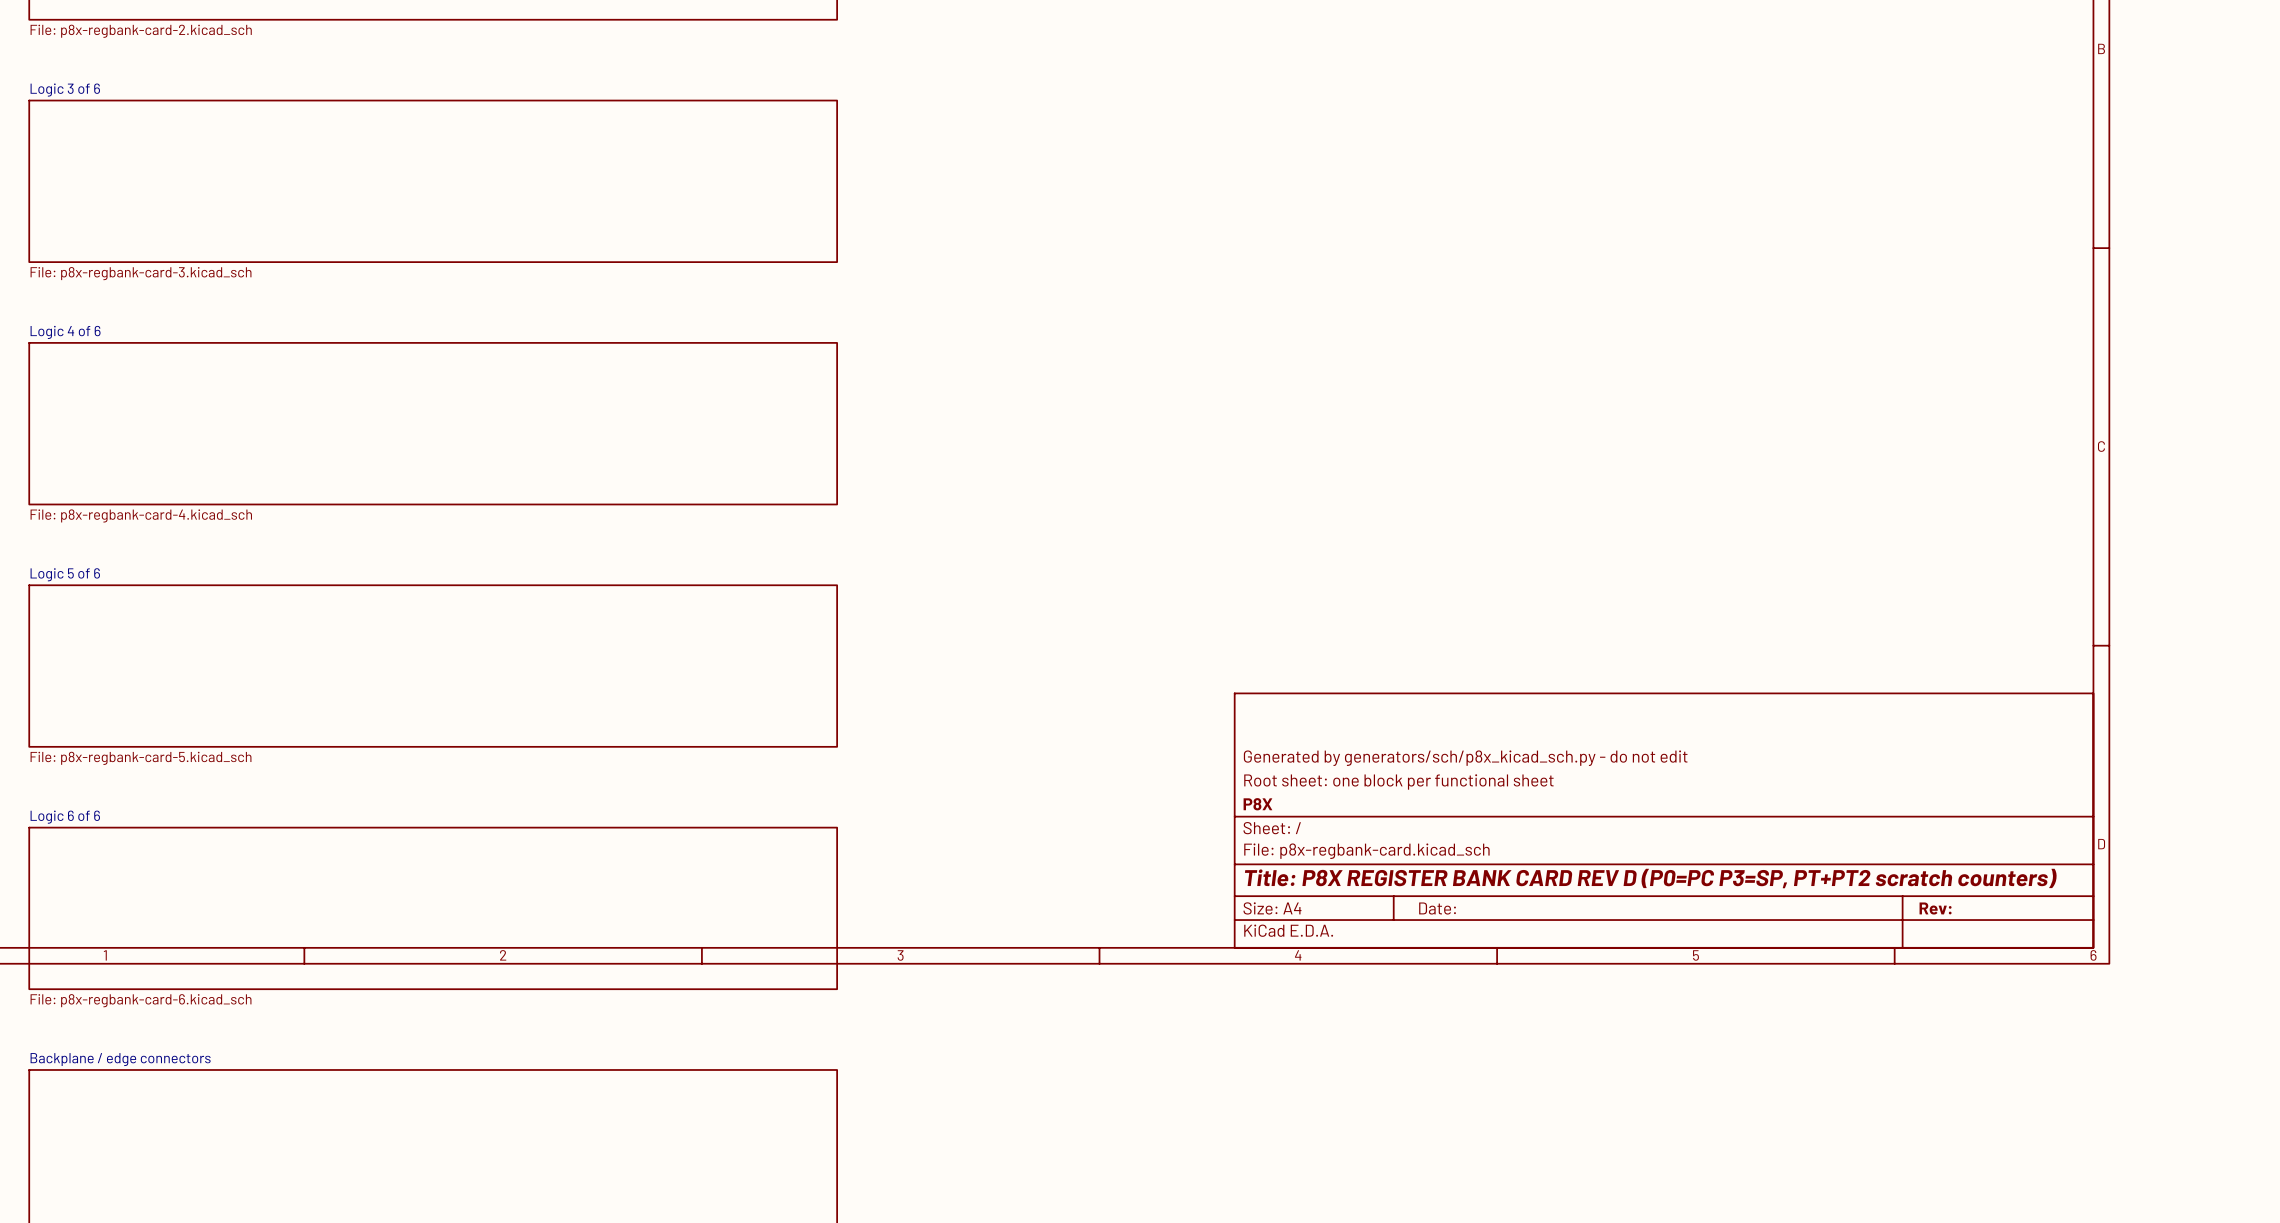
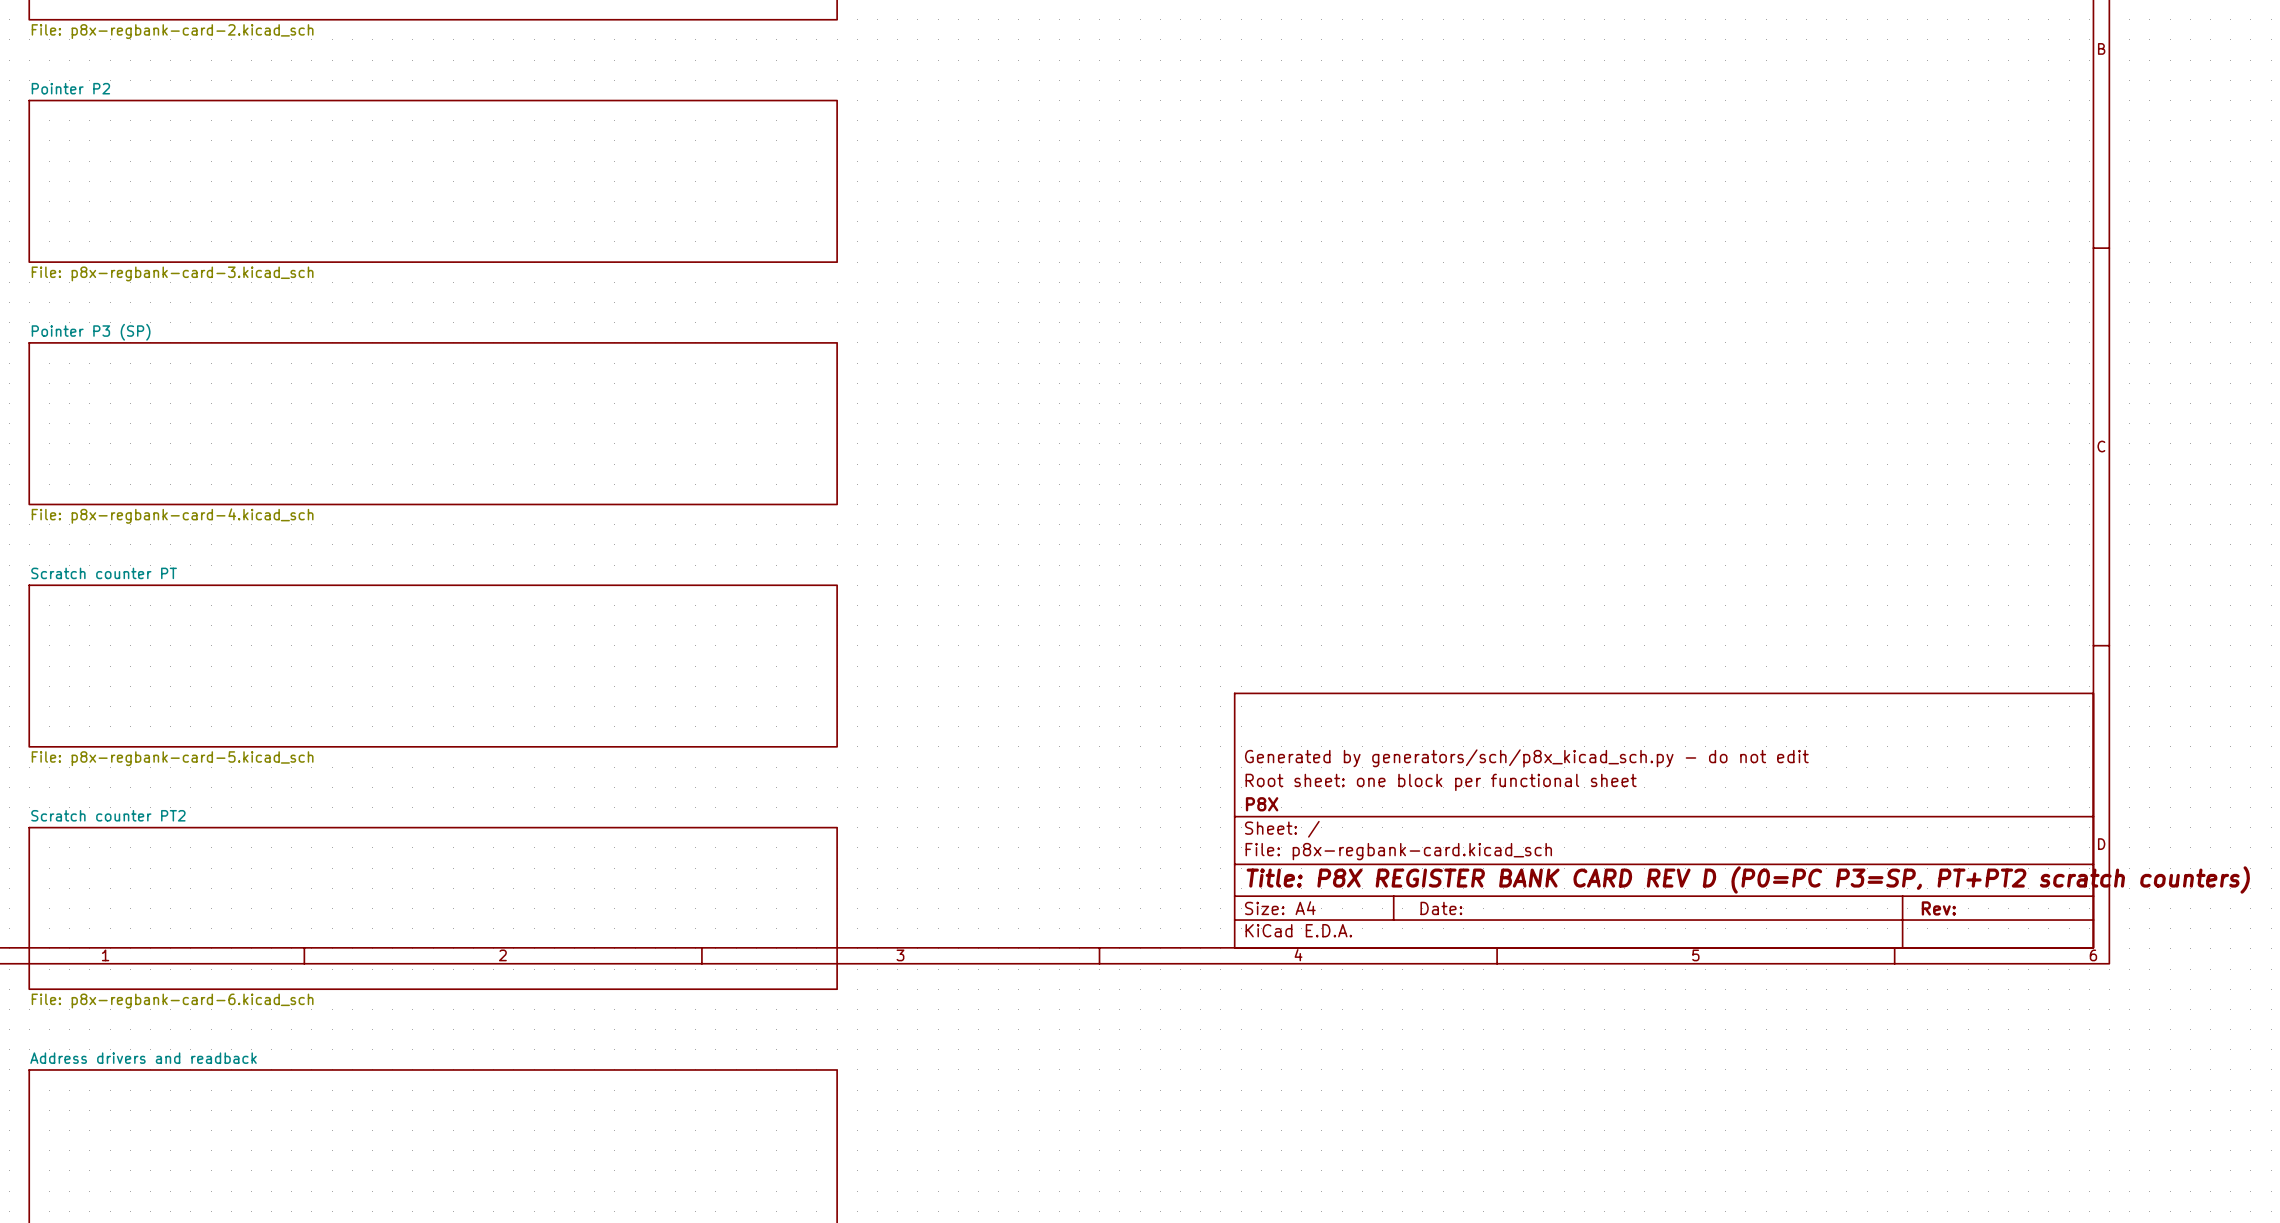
sheet Logic 3 of 6 name: Logic 3 of 6 (65, 90) -> Pointer P2 (70, 88)
sheet Logic 4 of 6 name: Logic 4 of 6 (65, 332) -> Pointer P3 (SP) (91, 332)
sheet Logic 5 of 6 name: Logic 5 of 6 (65, 574) -> Scratch counter PT (104, 573)
sheet Logic 6 of 6 name: Logic 6 of 6 (65, 817) -> Scratch counter PT2 (108, 815)
sheet Backplane / edge connectors name: Backplane / edge connectors (120, 1059) -> Address drivers and readback (143, 1058)

